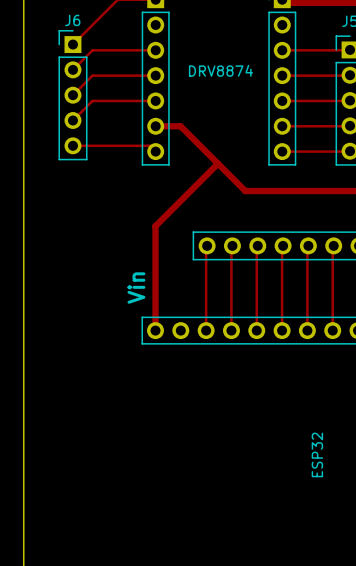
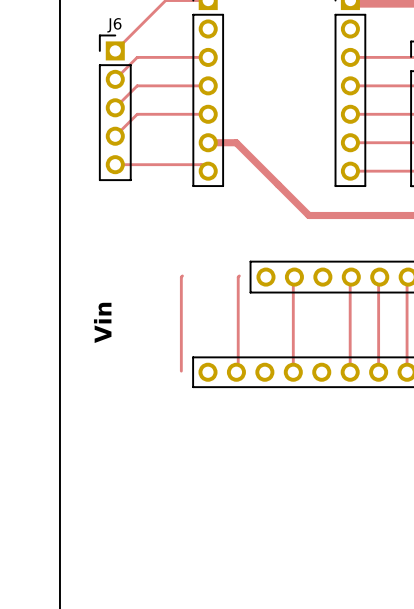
part value: DRV8874 (220, 70) -> none
track: (218, 163) (155, 226) (155, 330) -> none
track: (207, 245) (206, 330) -> (182, 275) (181, 371)
track: (257, 245) (256, 330) -> (239, 275) (238, 371)
text position: Vin (136, 288) -> Vin (102, 322)
part value: ESP32 (317, 454) -> none

